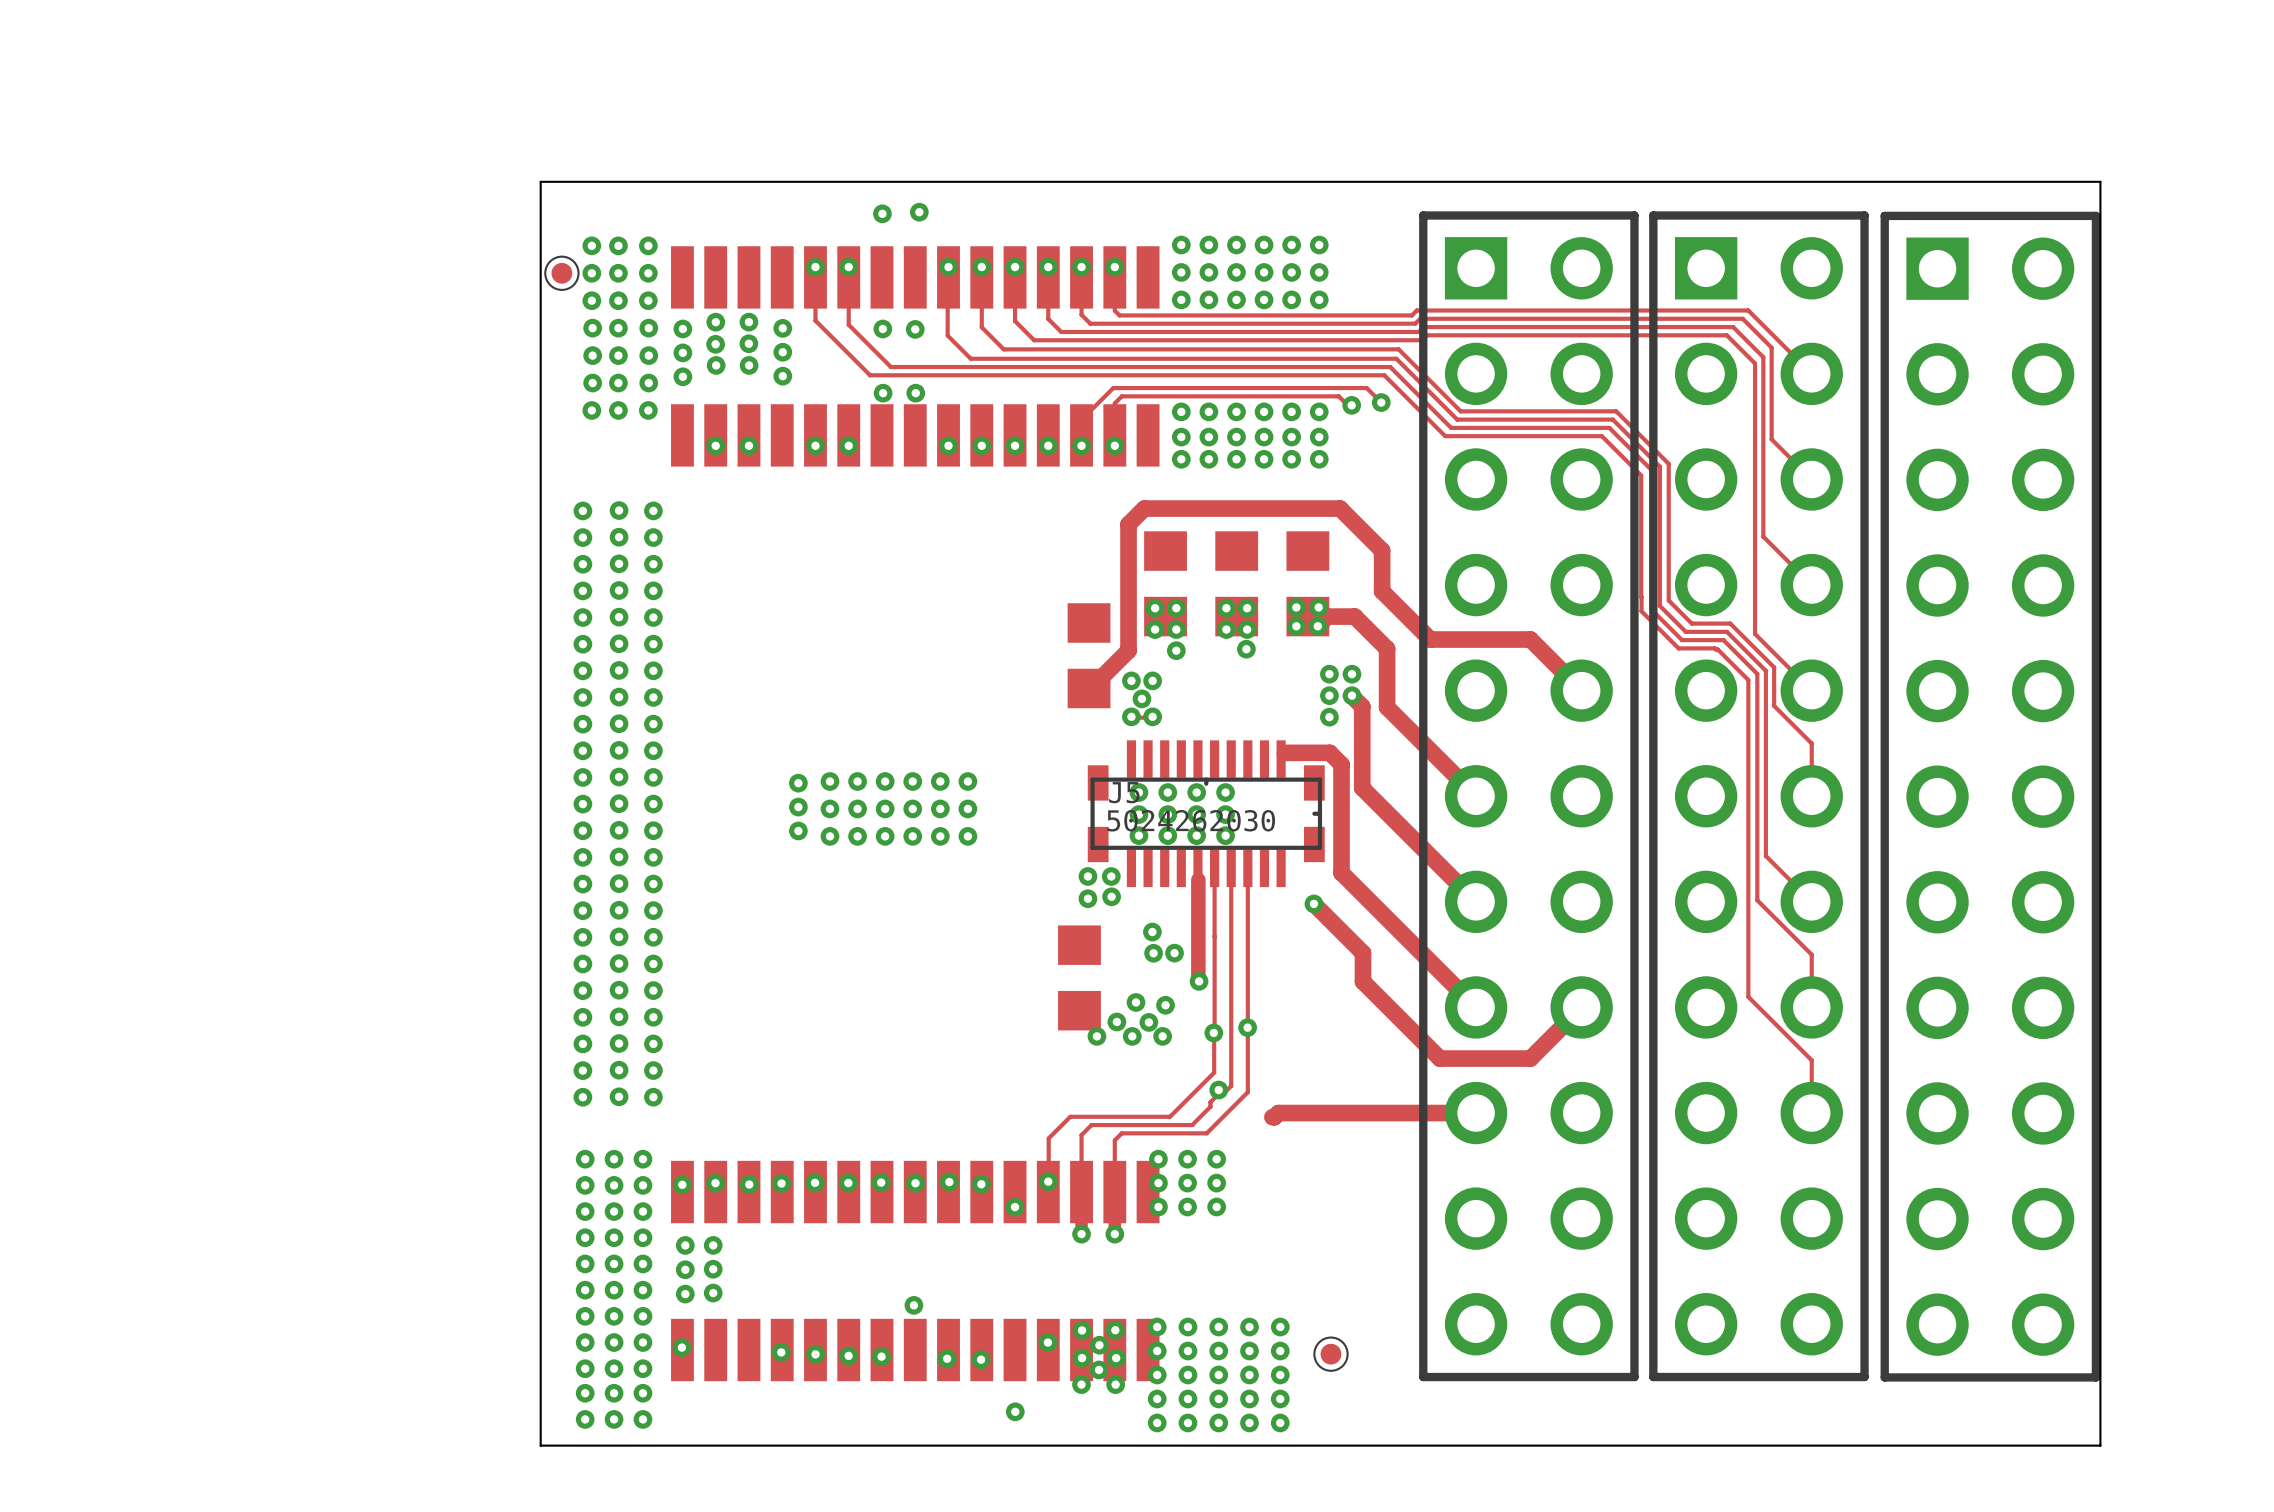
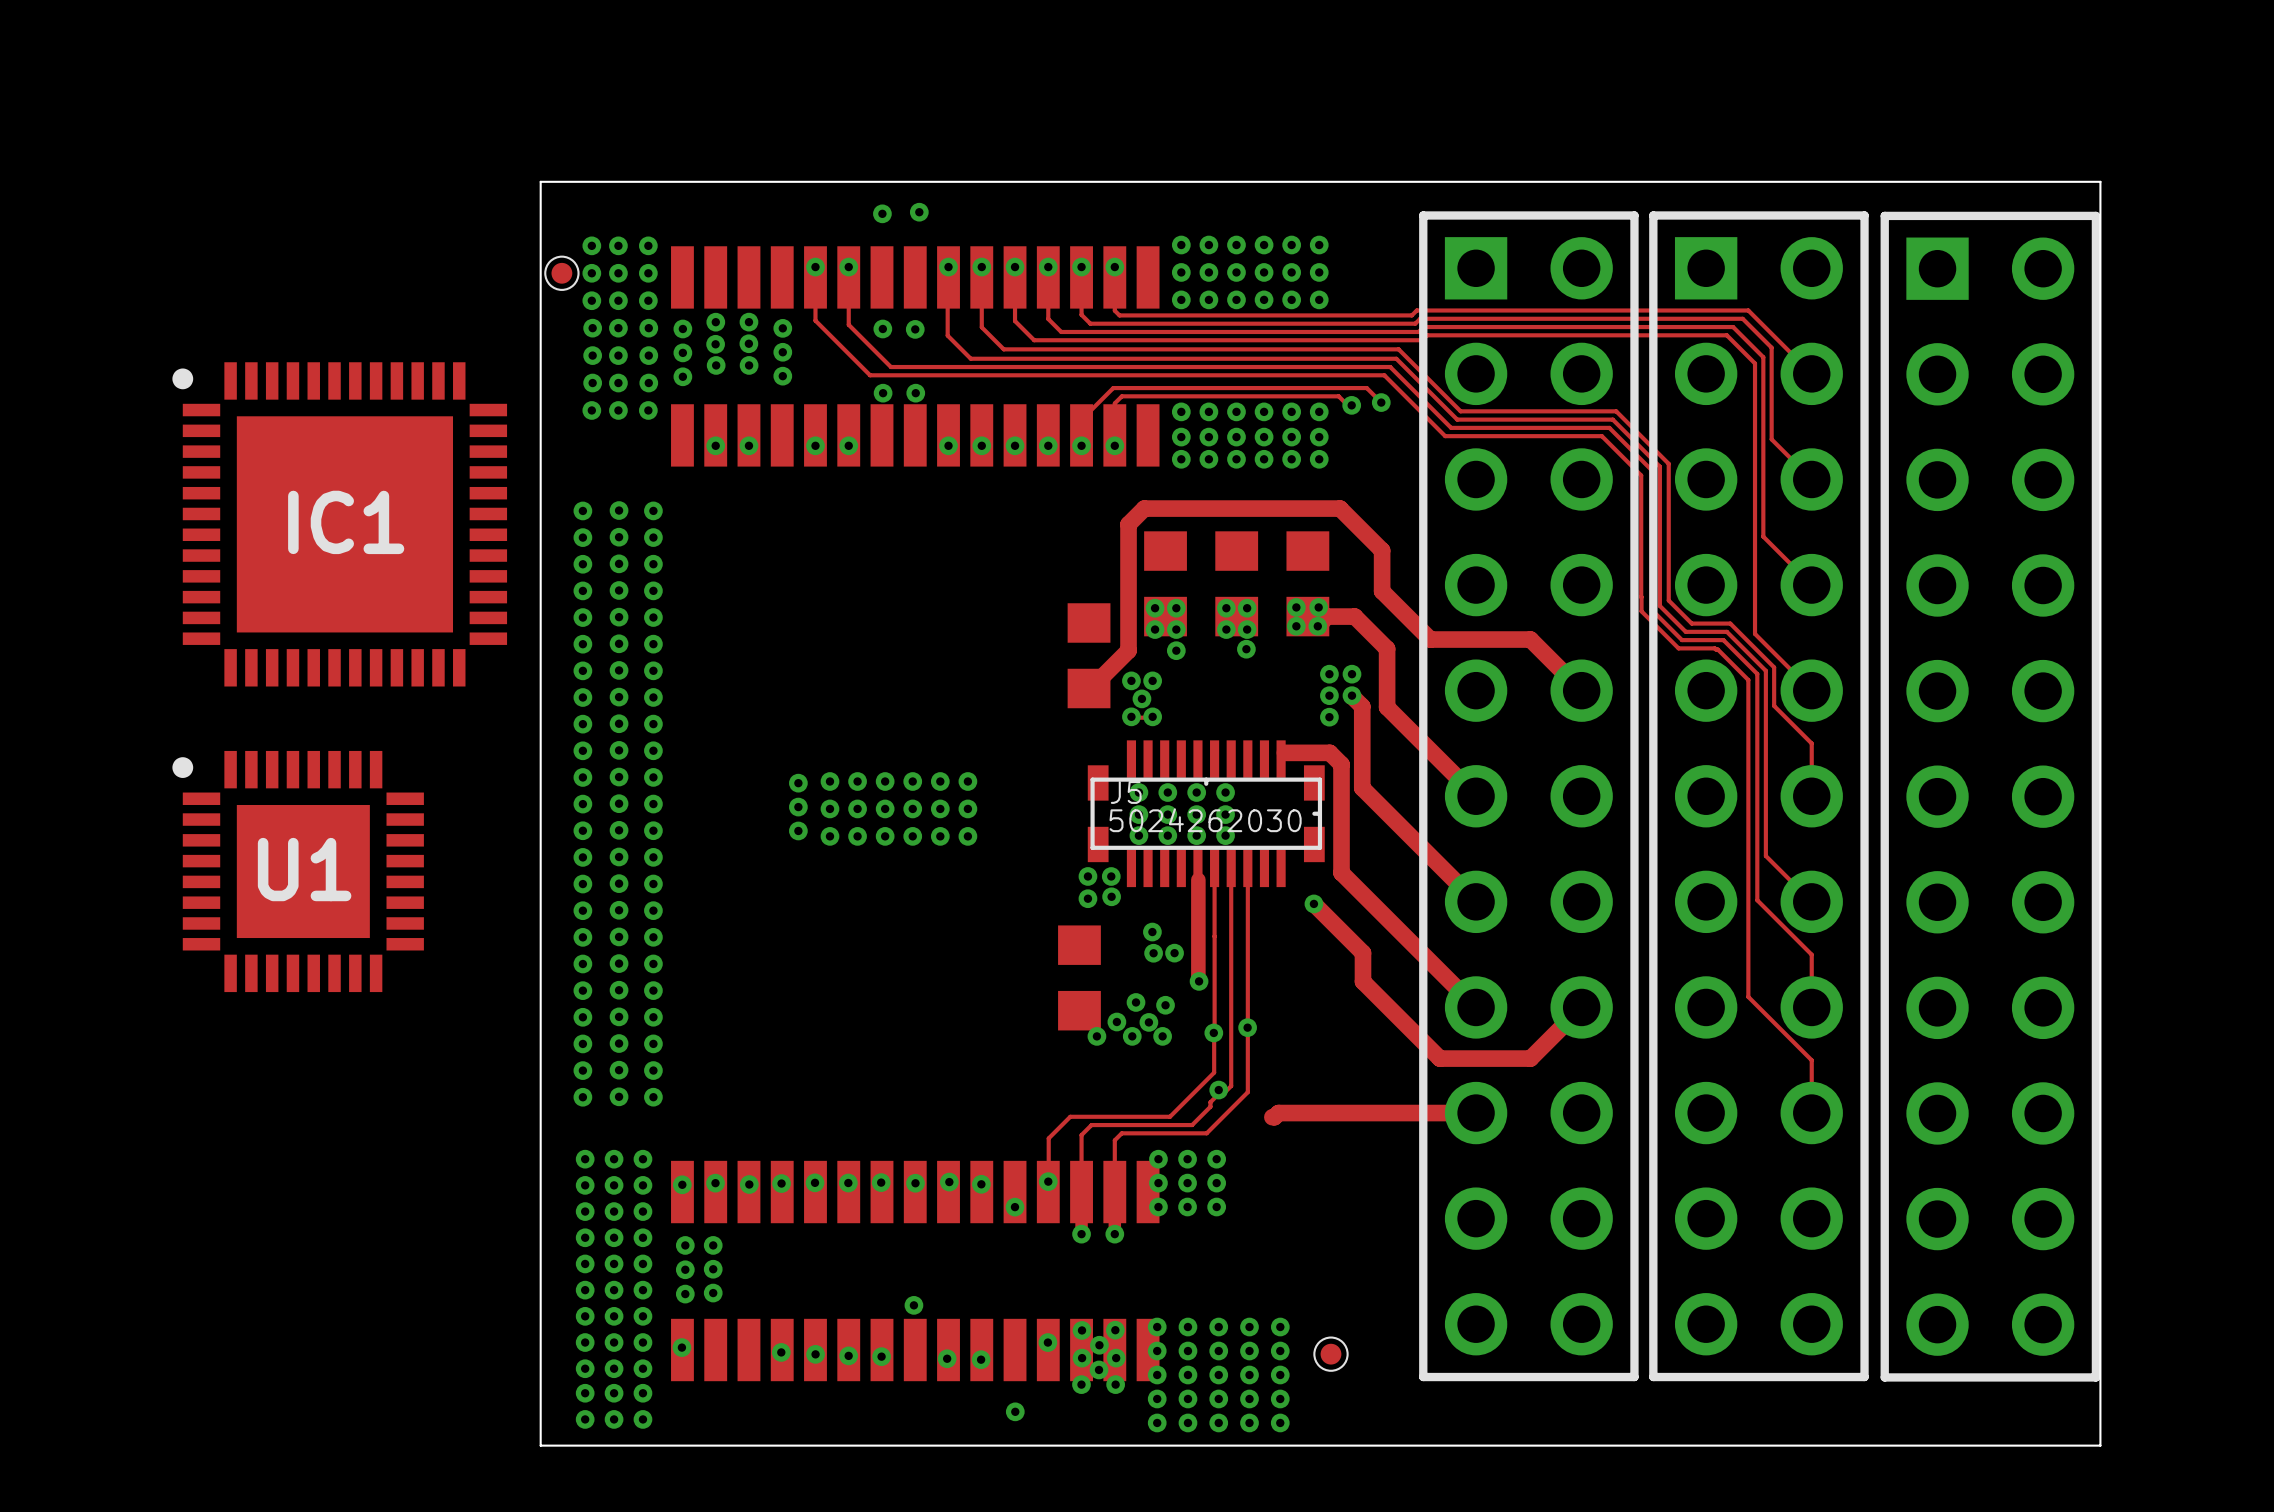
IC1: none -> (339, 524)
U1: none -> (298, 871)

